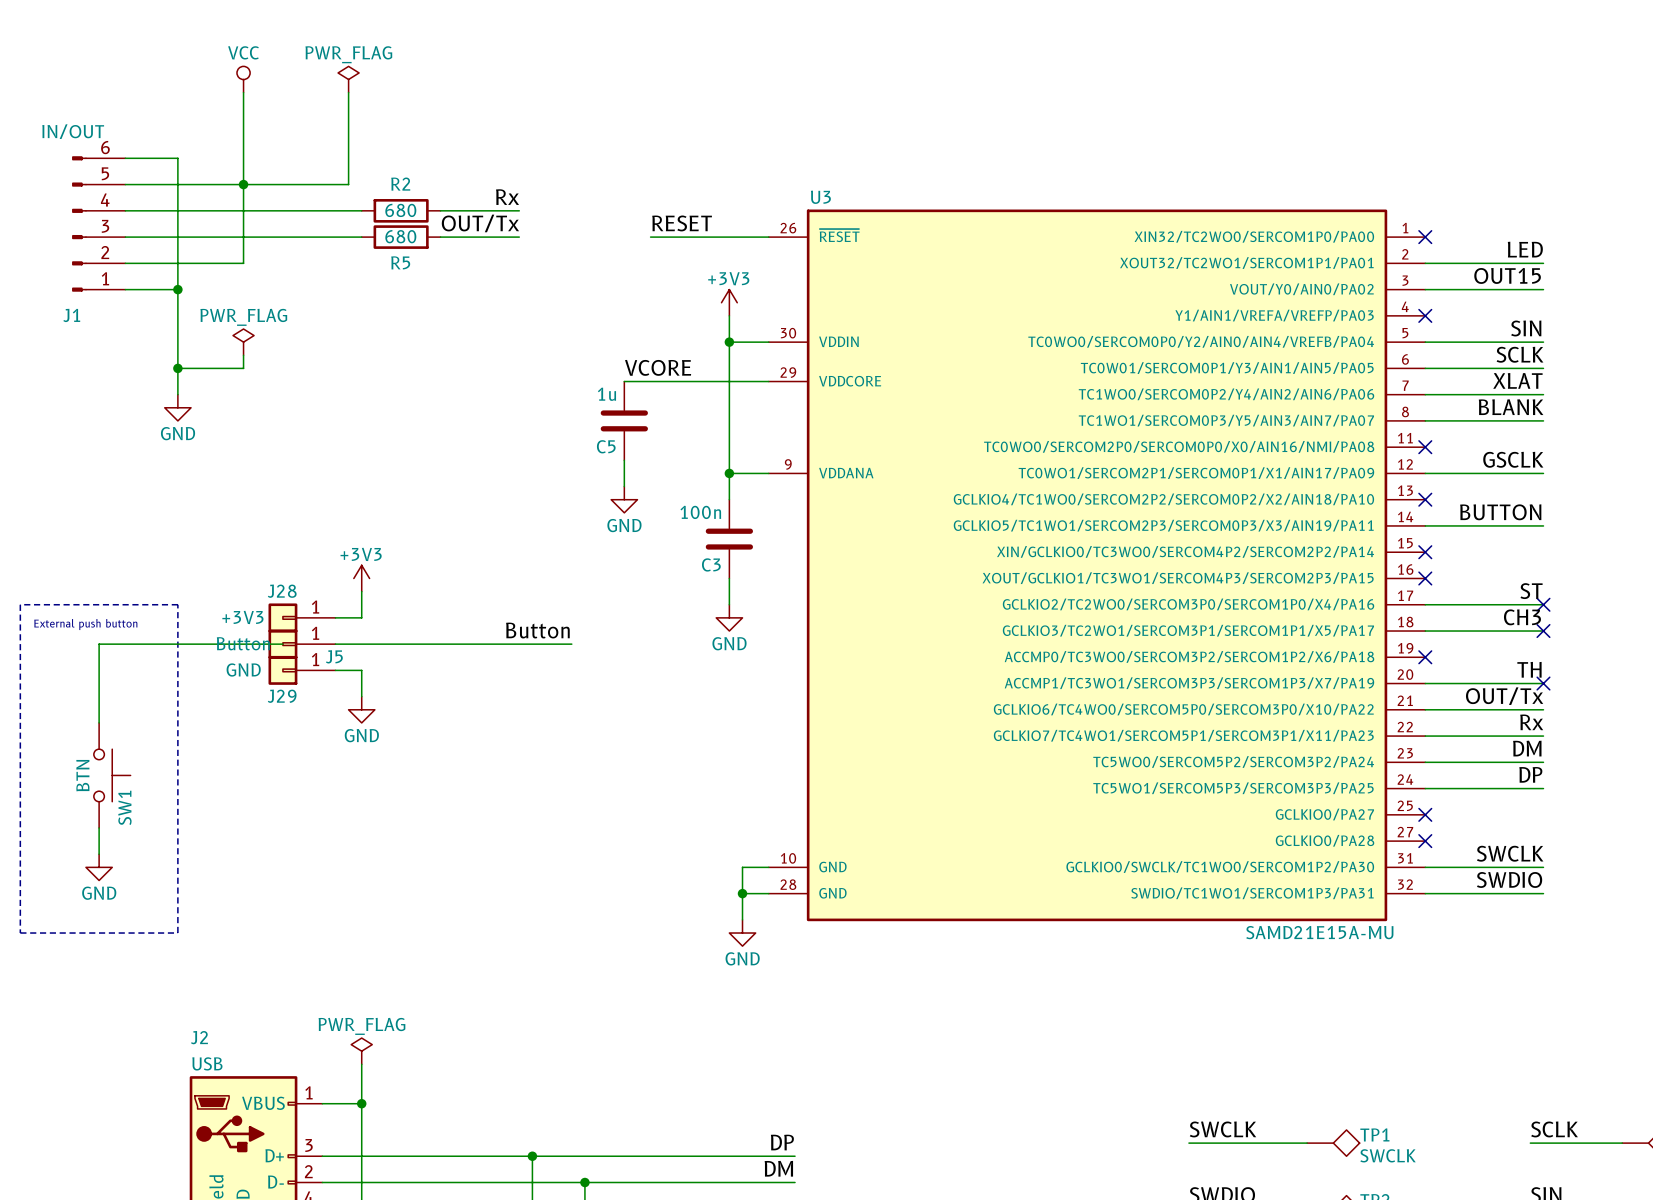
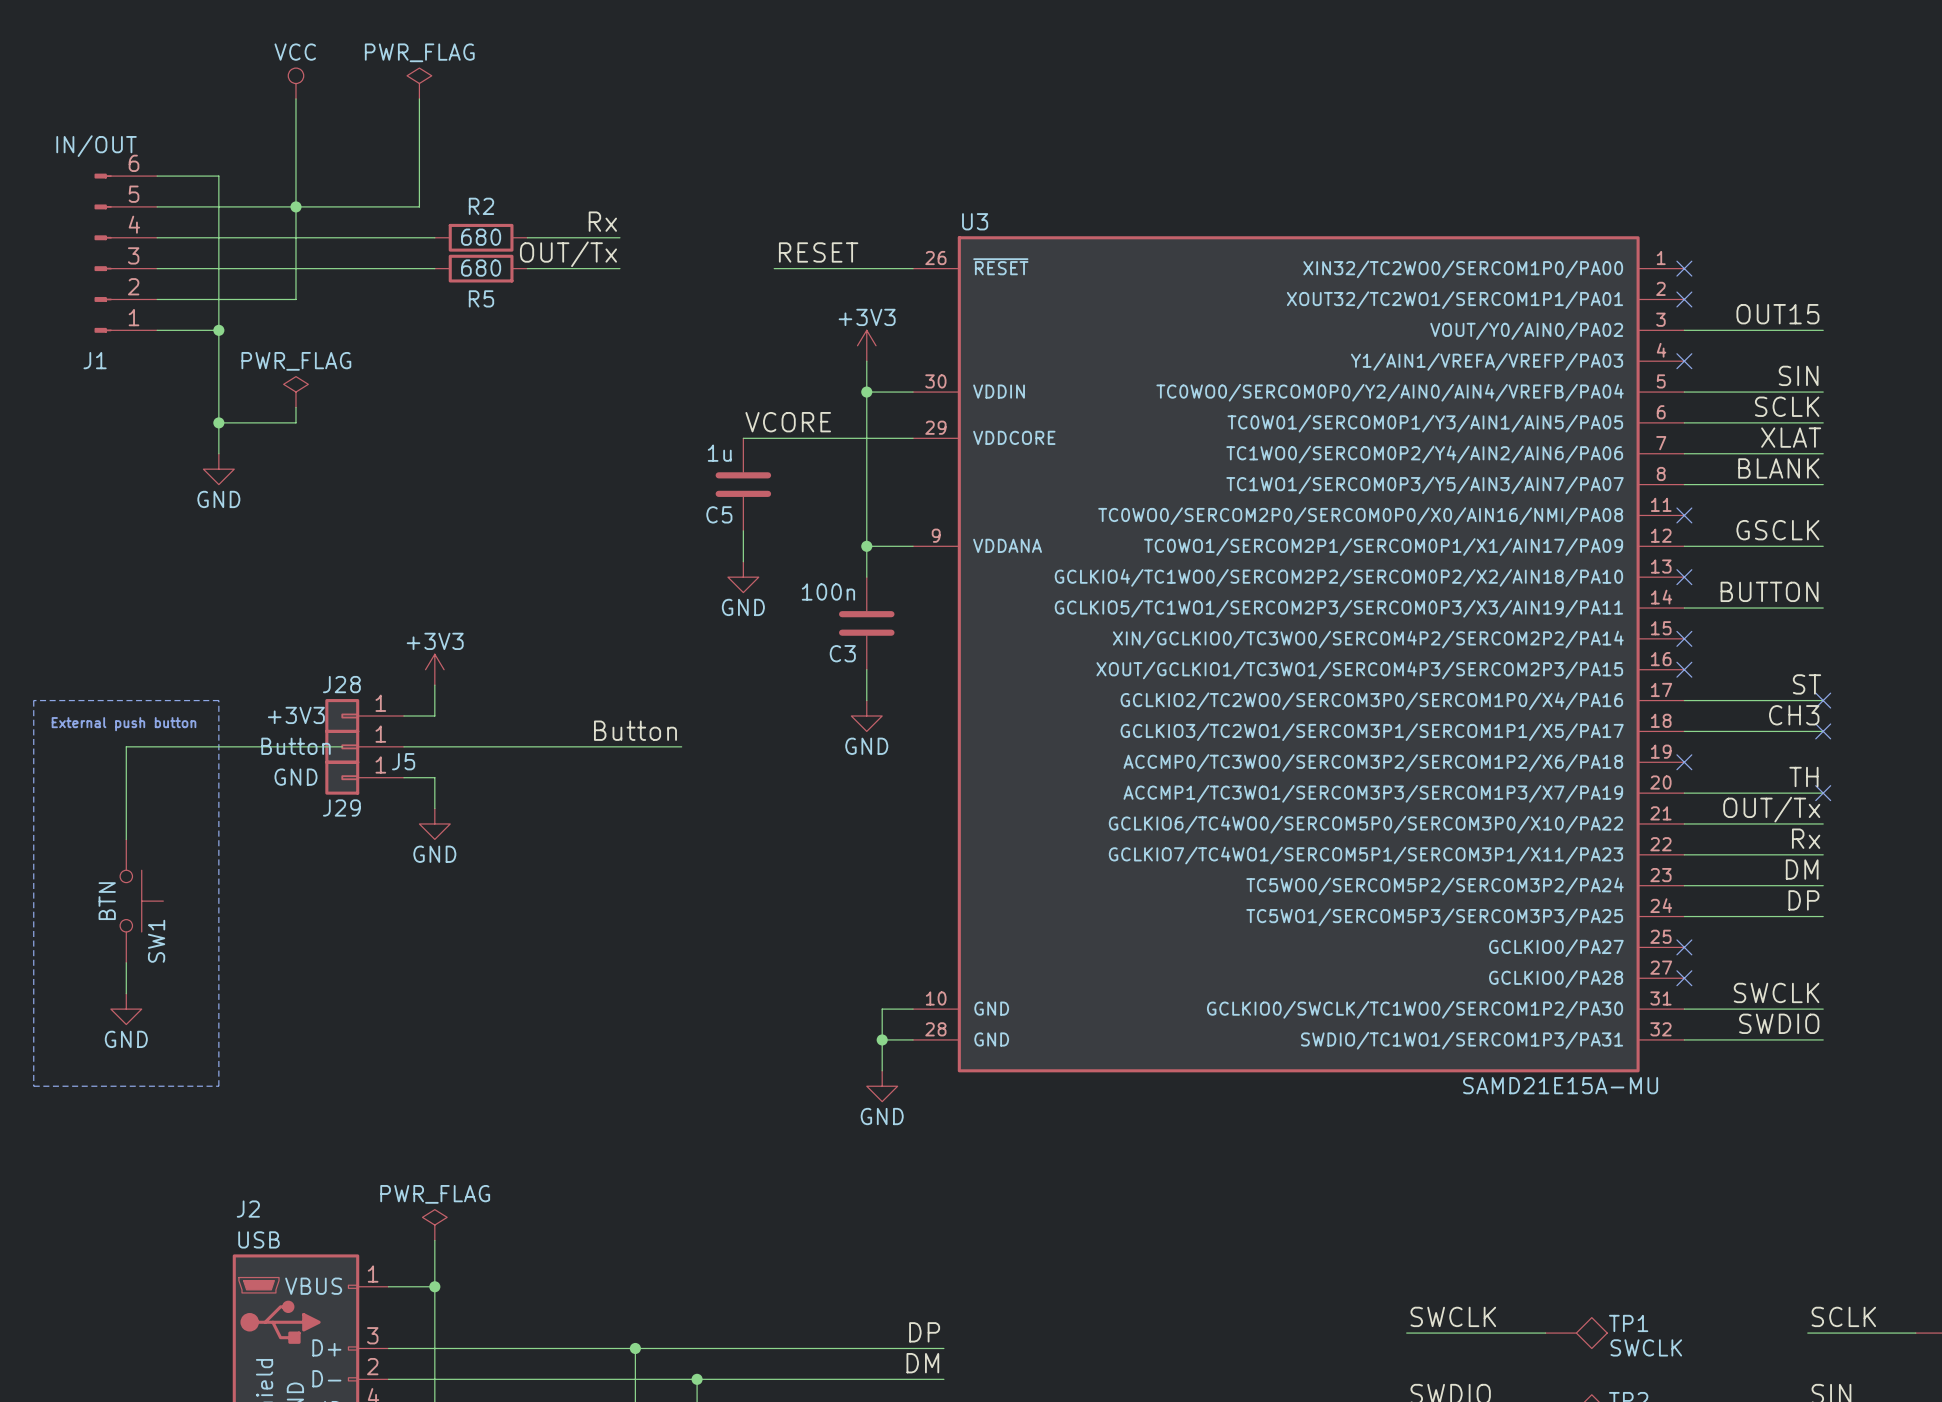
label: LED (1525, 249) -> none
wire: (1425, 263) (1543, 263) -> none
no-connect mark: none -> (1684, 299)

